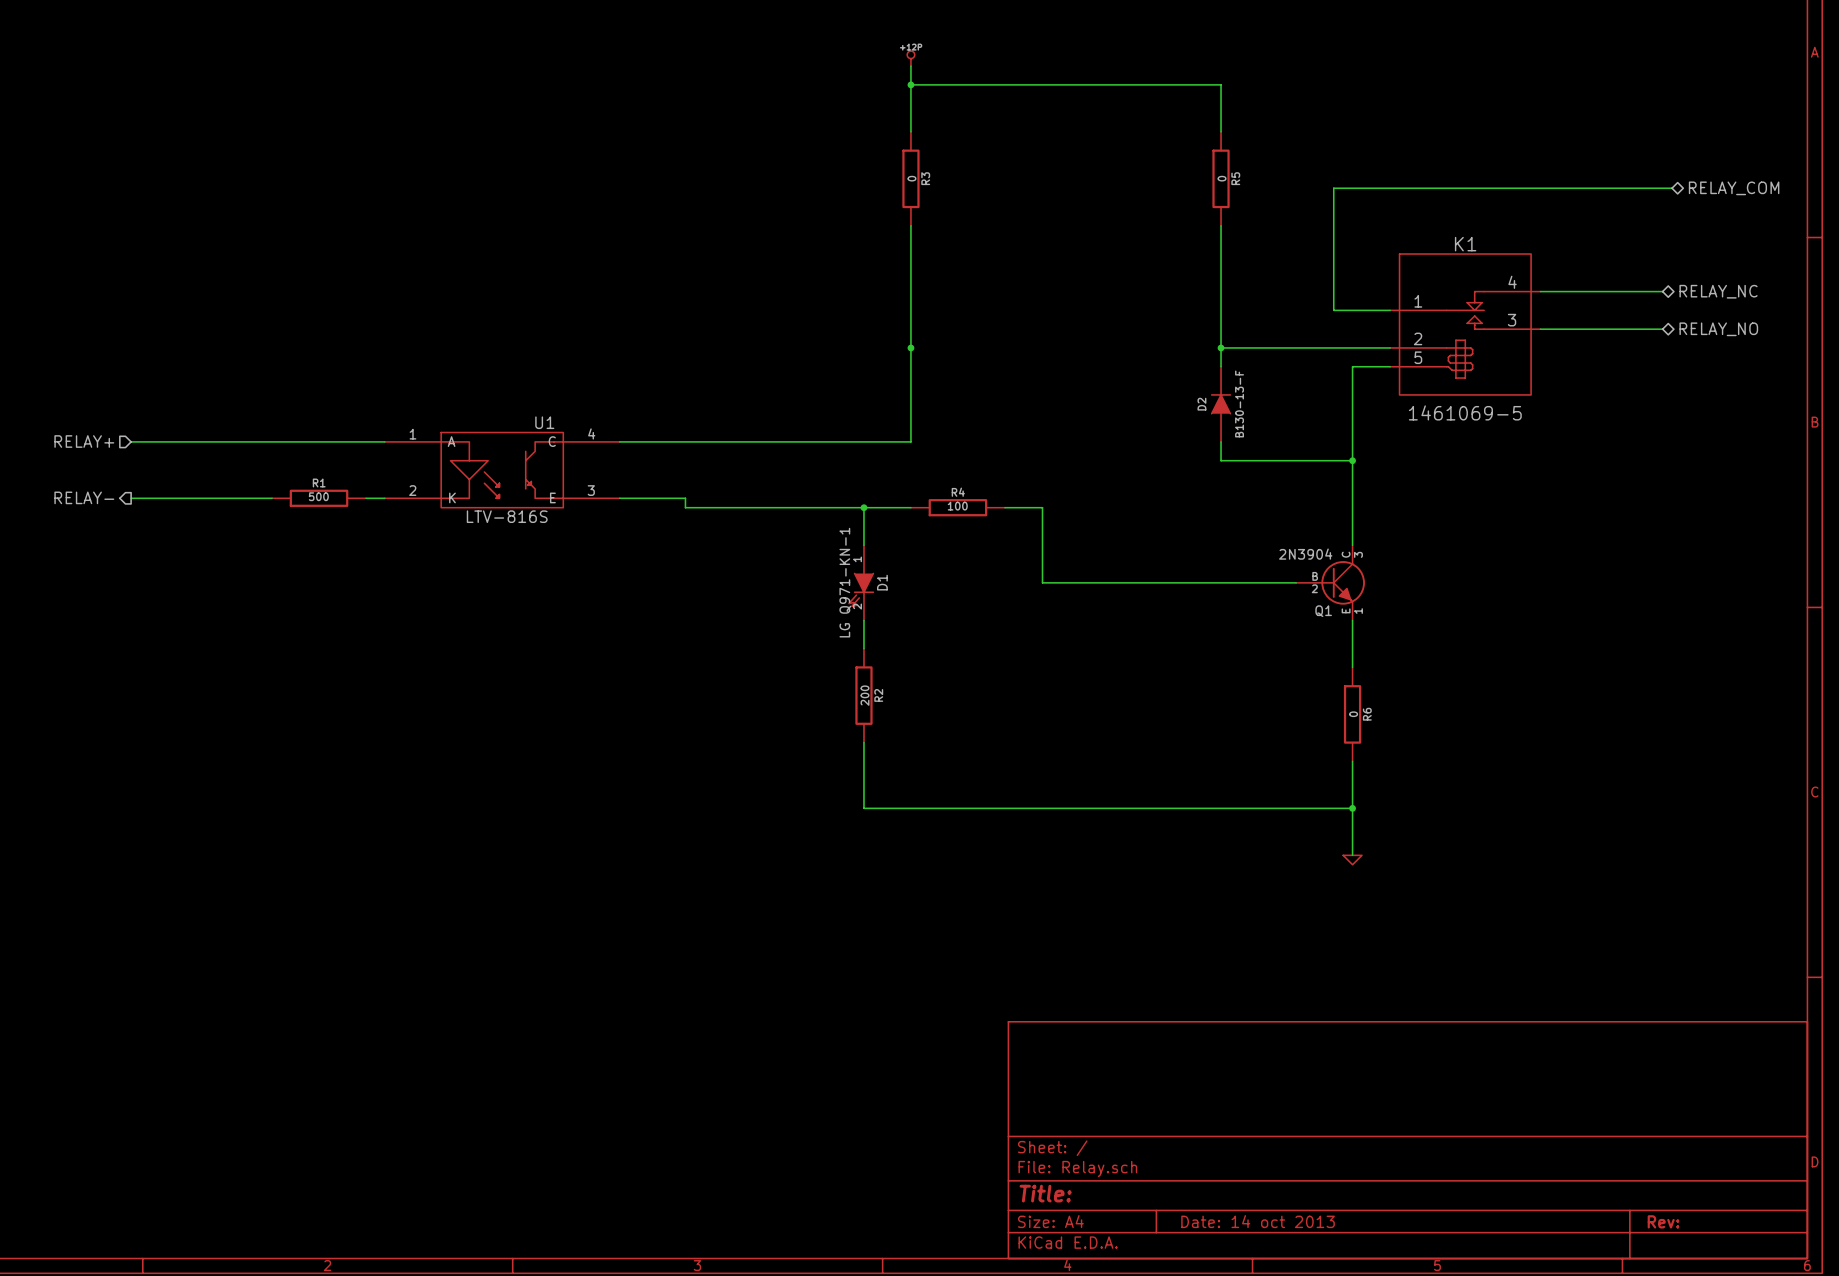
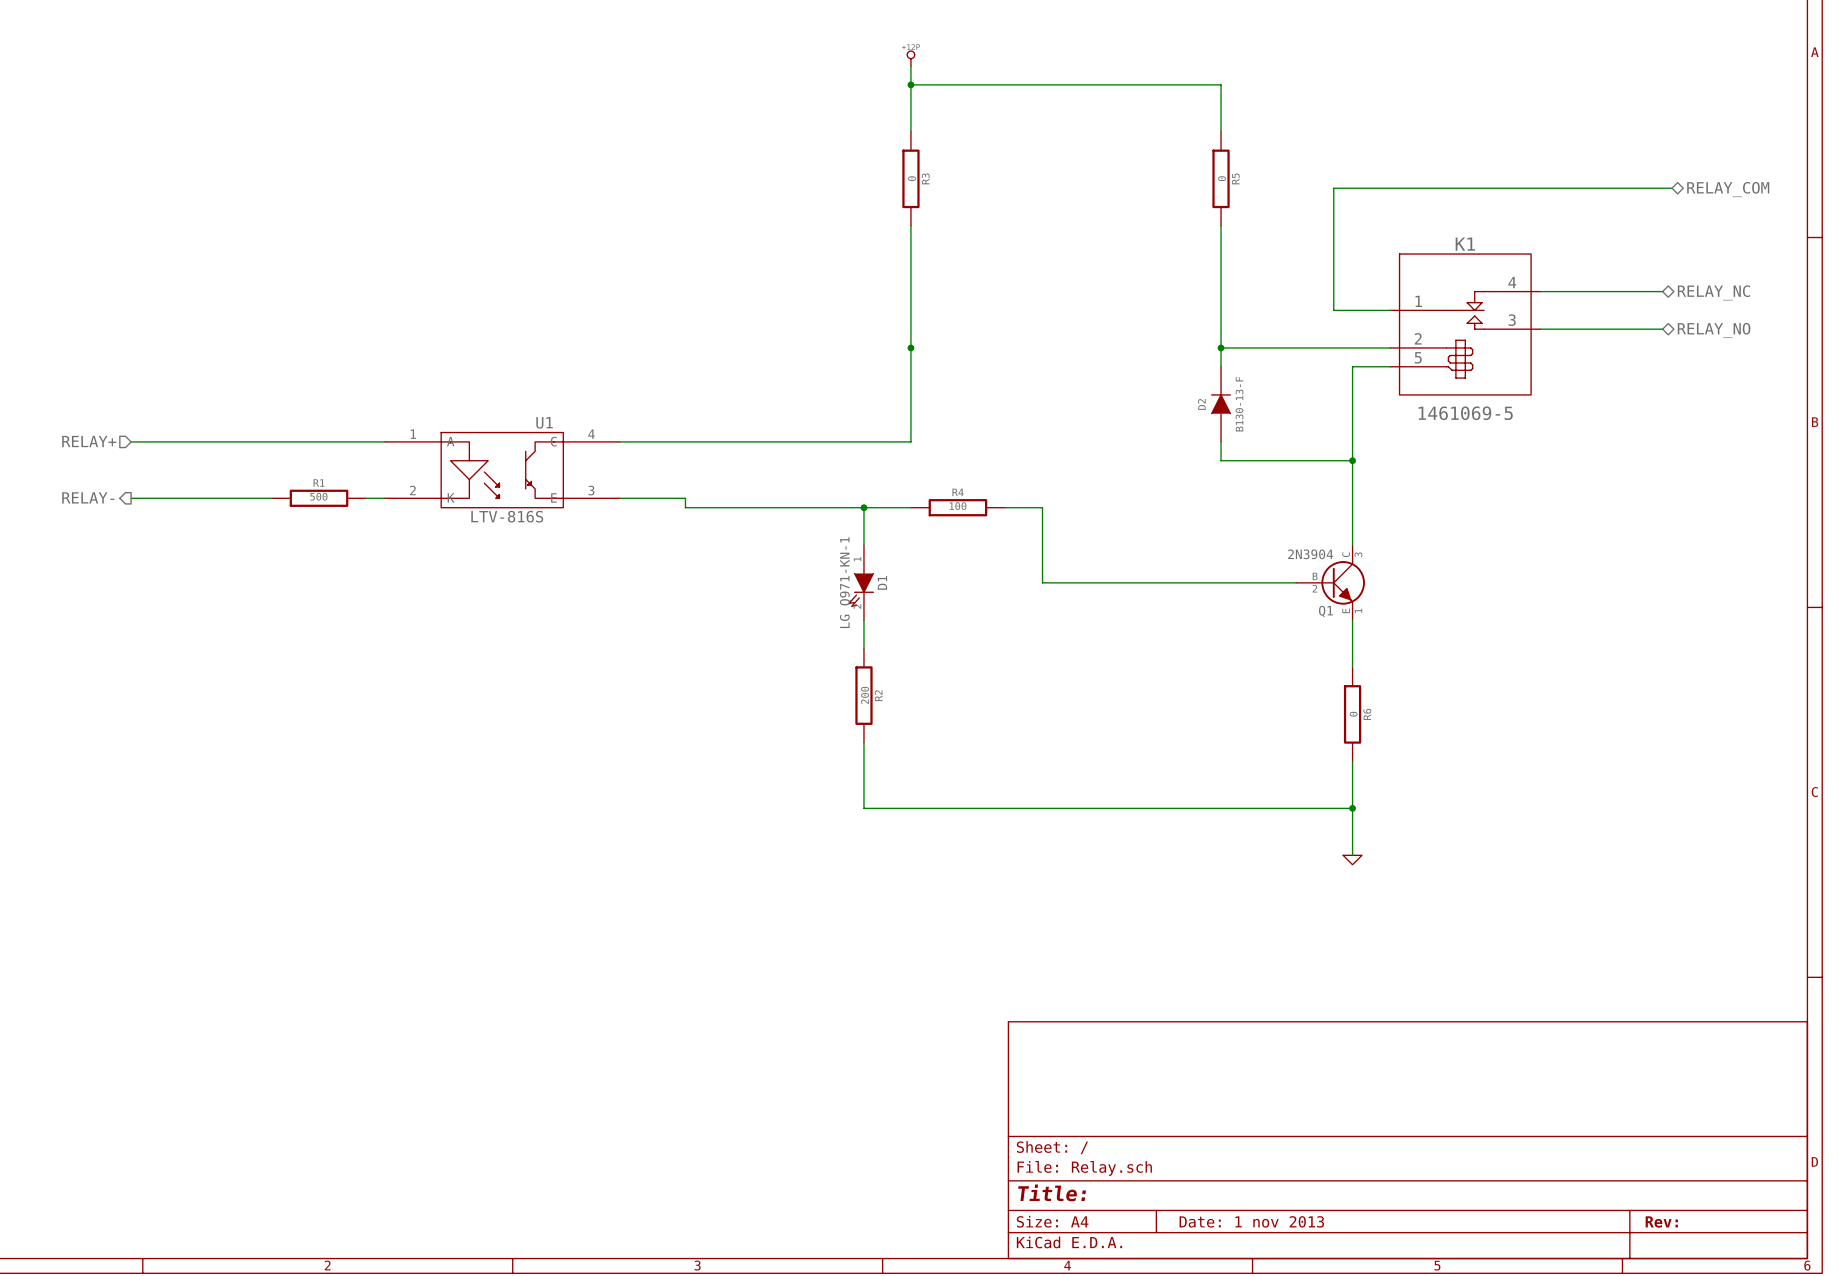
title block: Date: 14 oct 2013 (1258, 1221) -> Date: 1 nov 2013 (1251, 1221)

